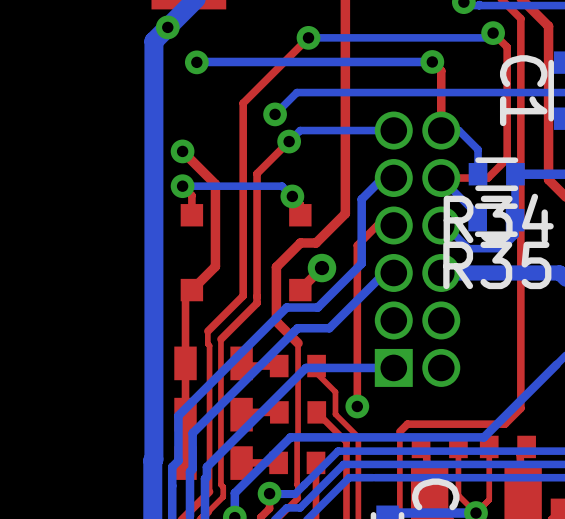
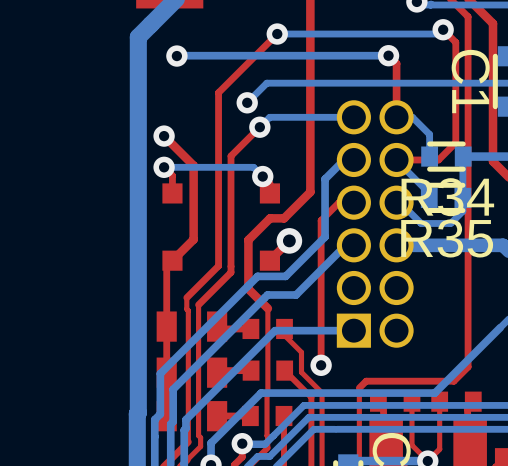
via: (167, 27) -> none

